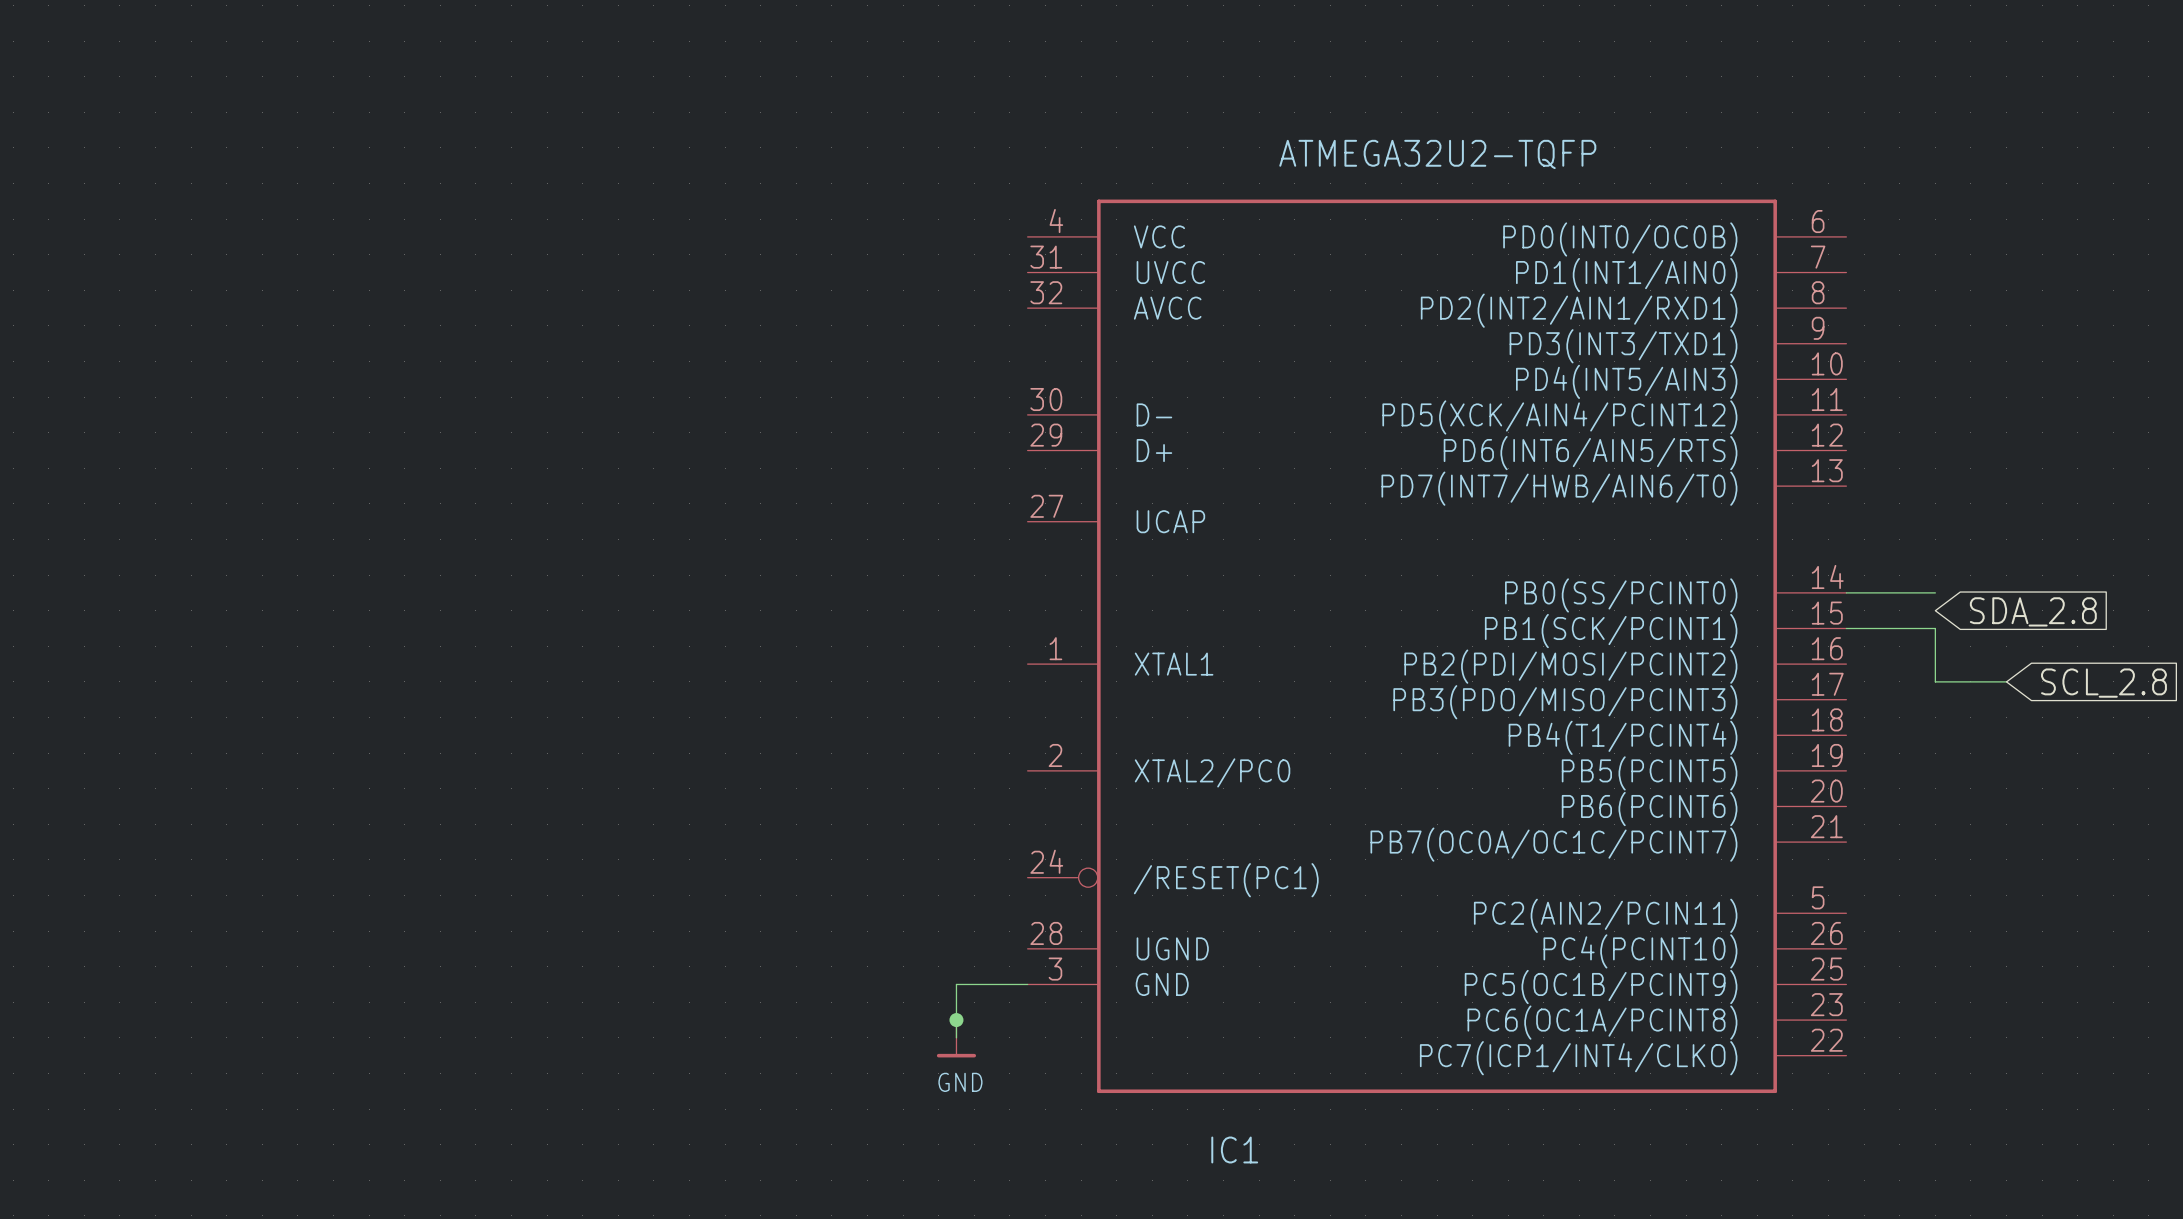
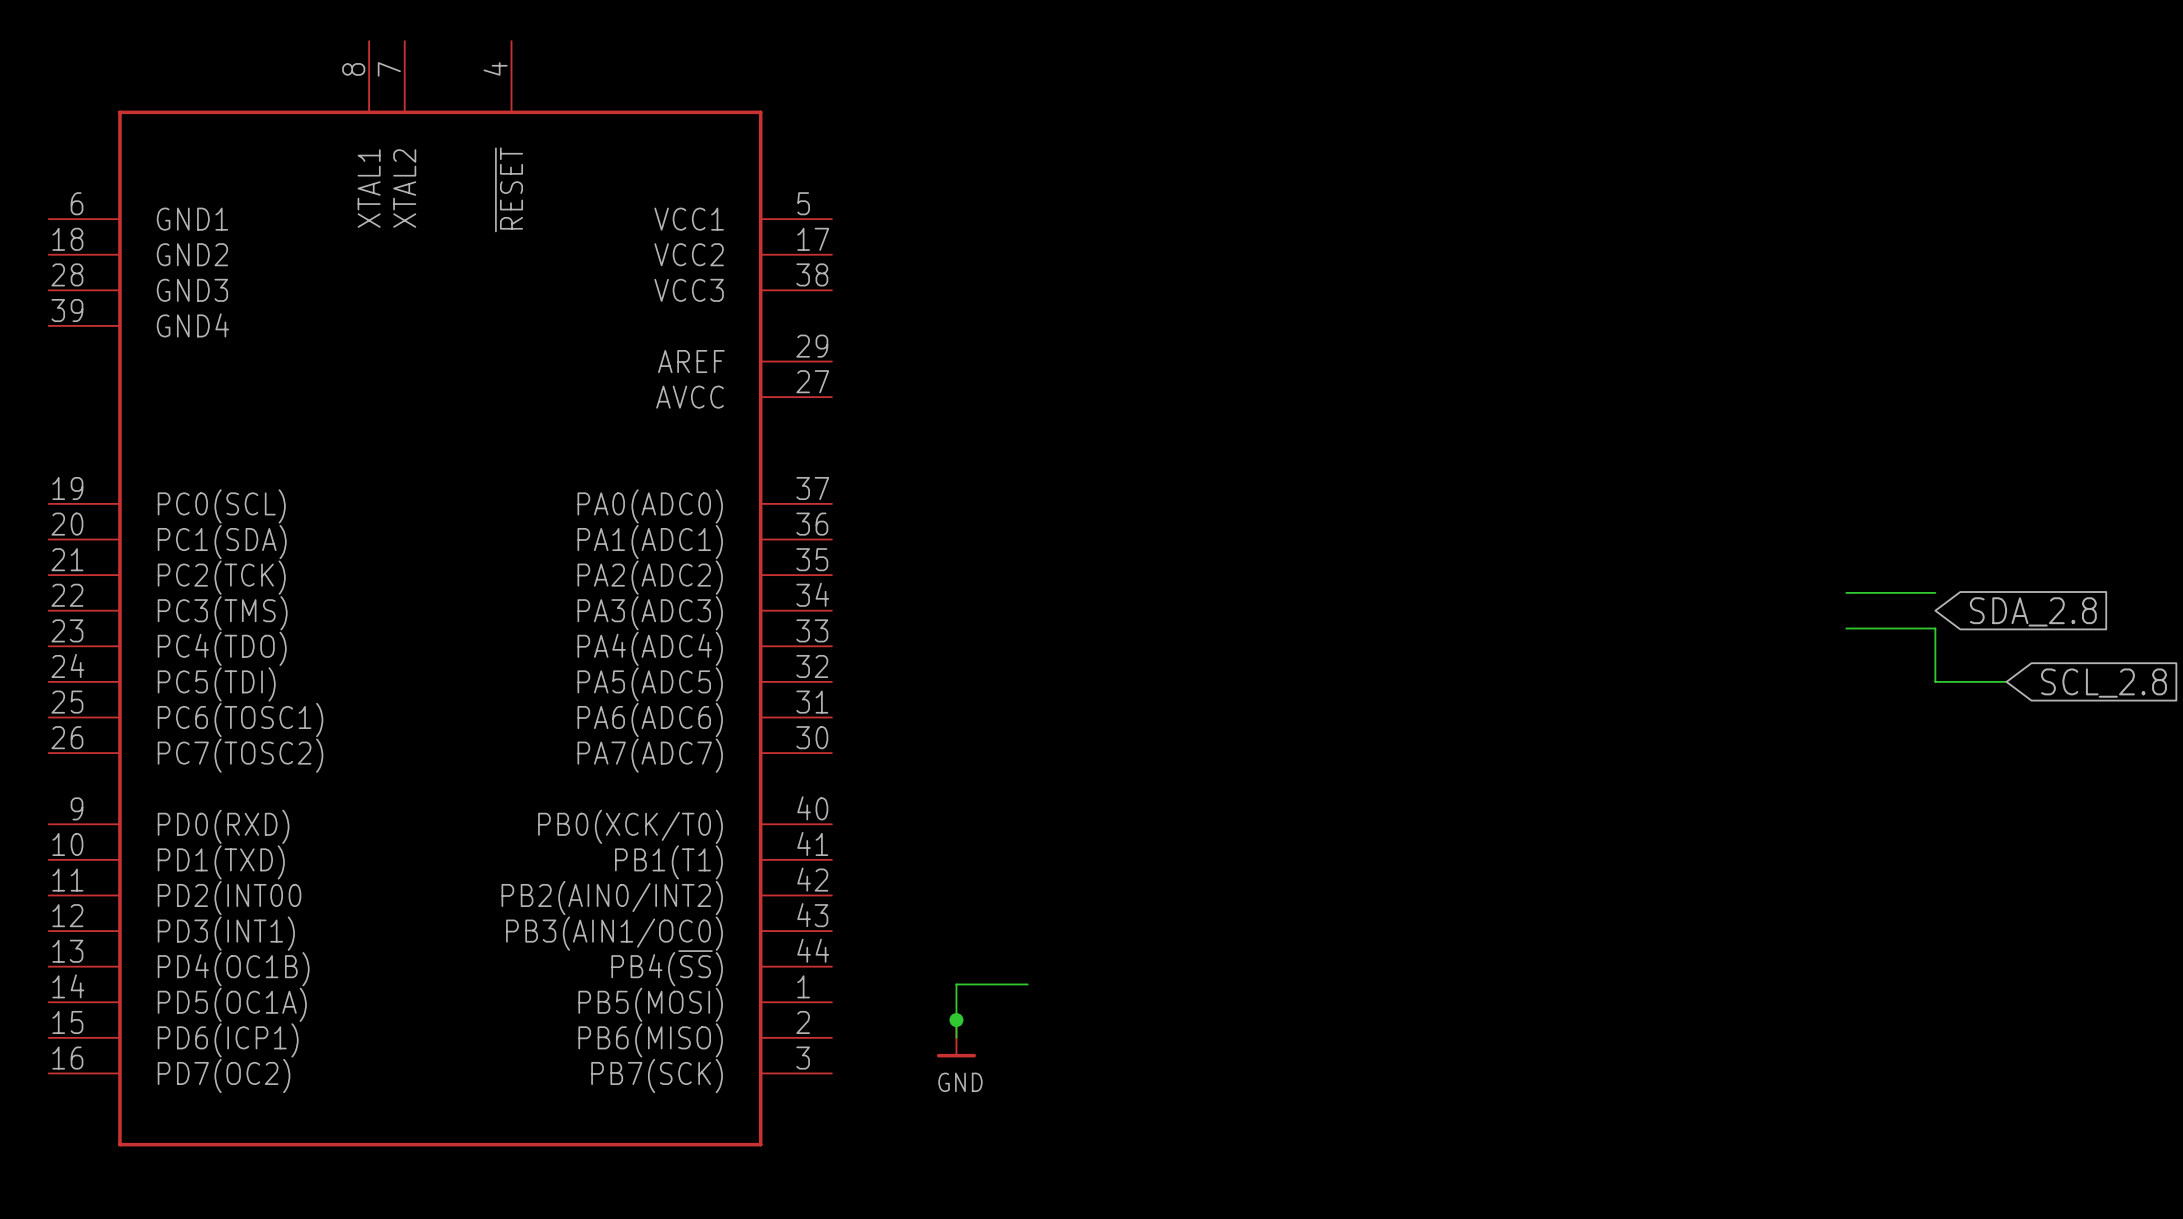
part: none -> (440, 593)
IC1: ATMEGA32U2-TQFP (1437, 646) -> none

